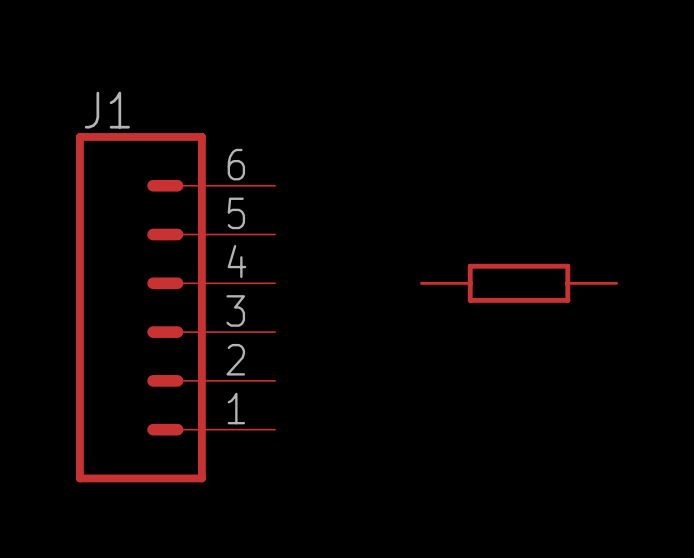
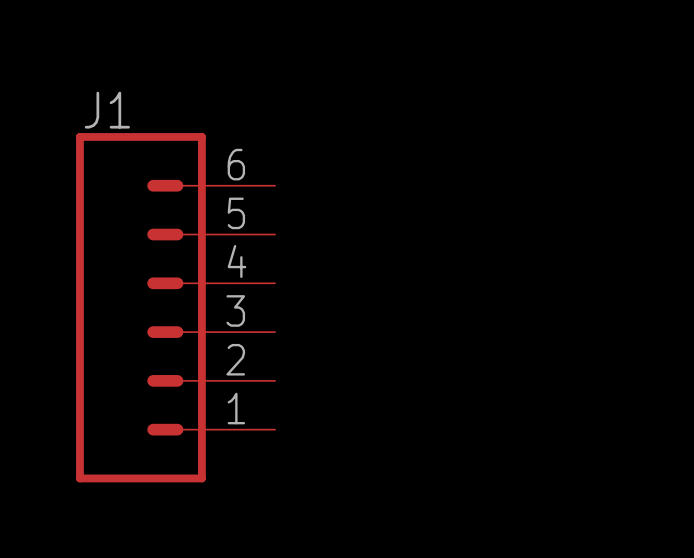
part: (519, 283) -> none

